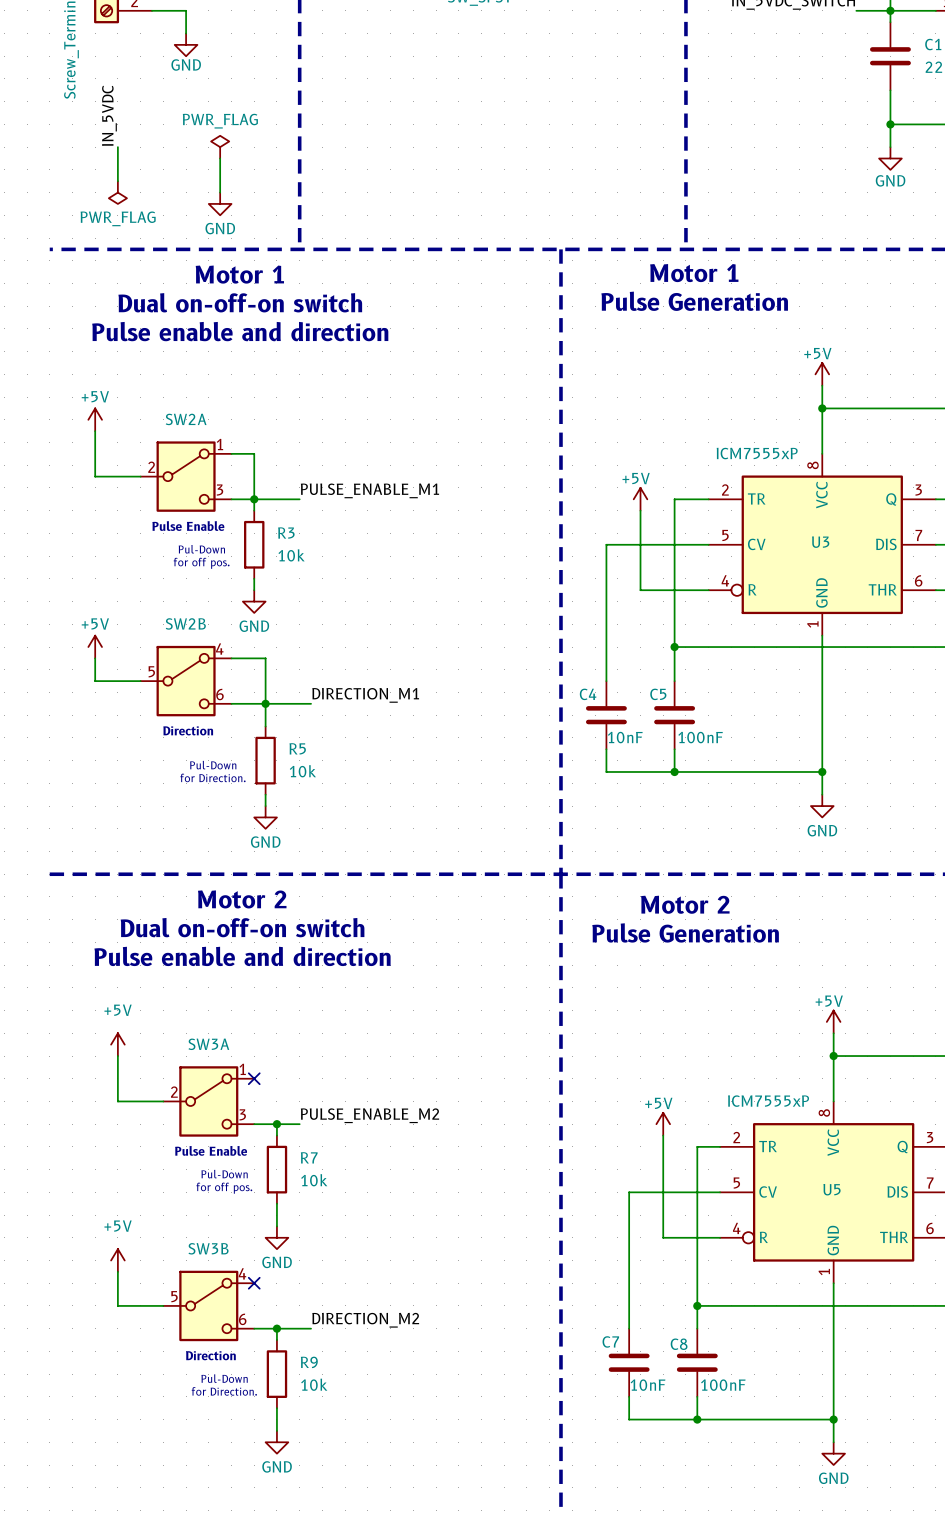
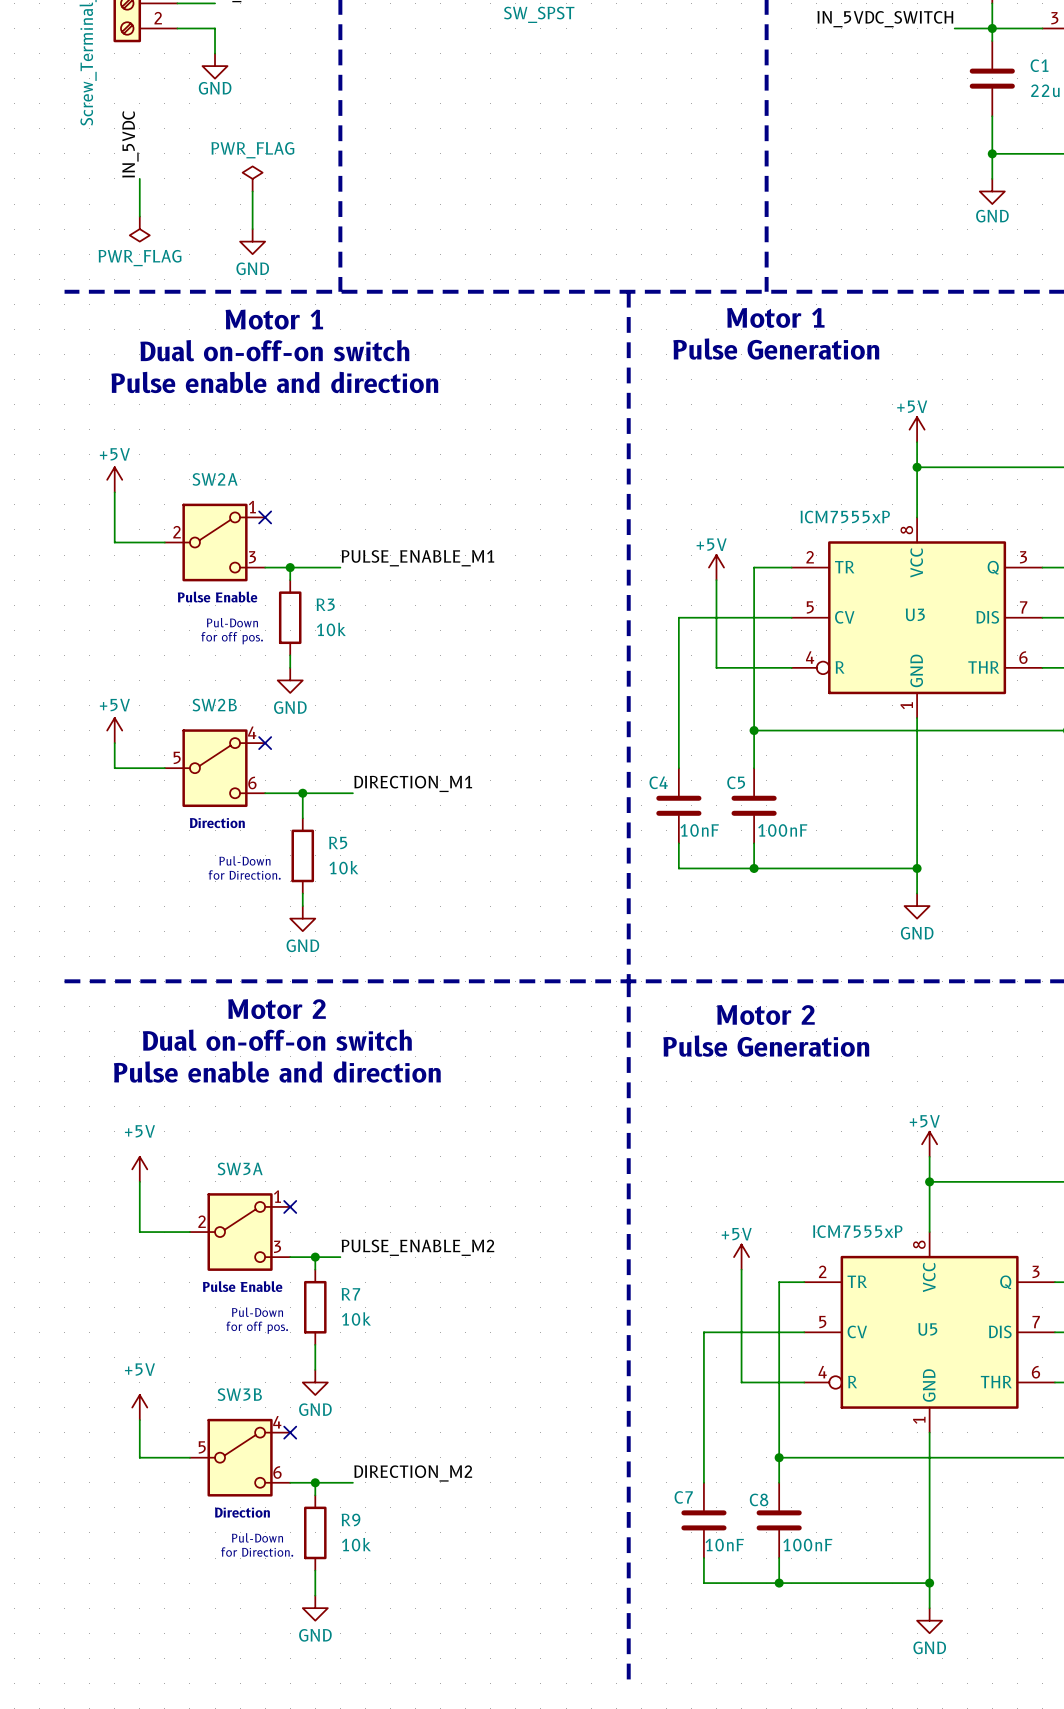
wire: (231, 453) (254, 453) (254, 499) -> none
no-connect mark: none -> (265, 517)
wire: (231, 658) (265, 658) (265, 703) -> none
no-connect mark: none -> (265, 743)

